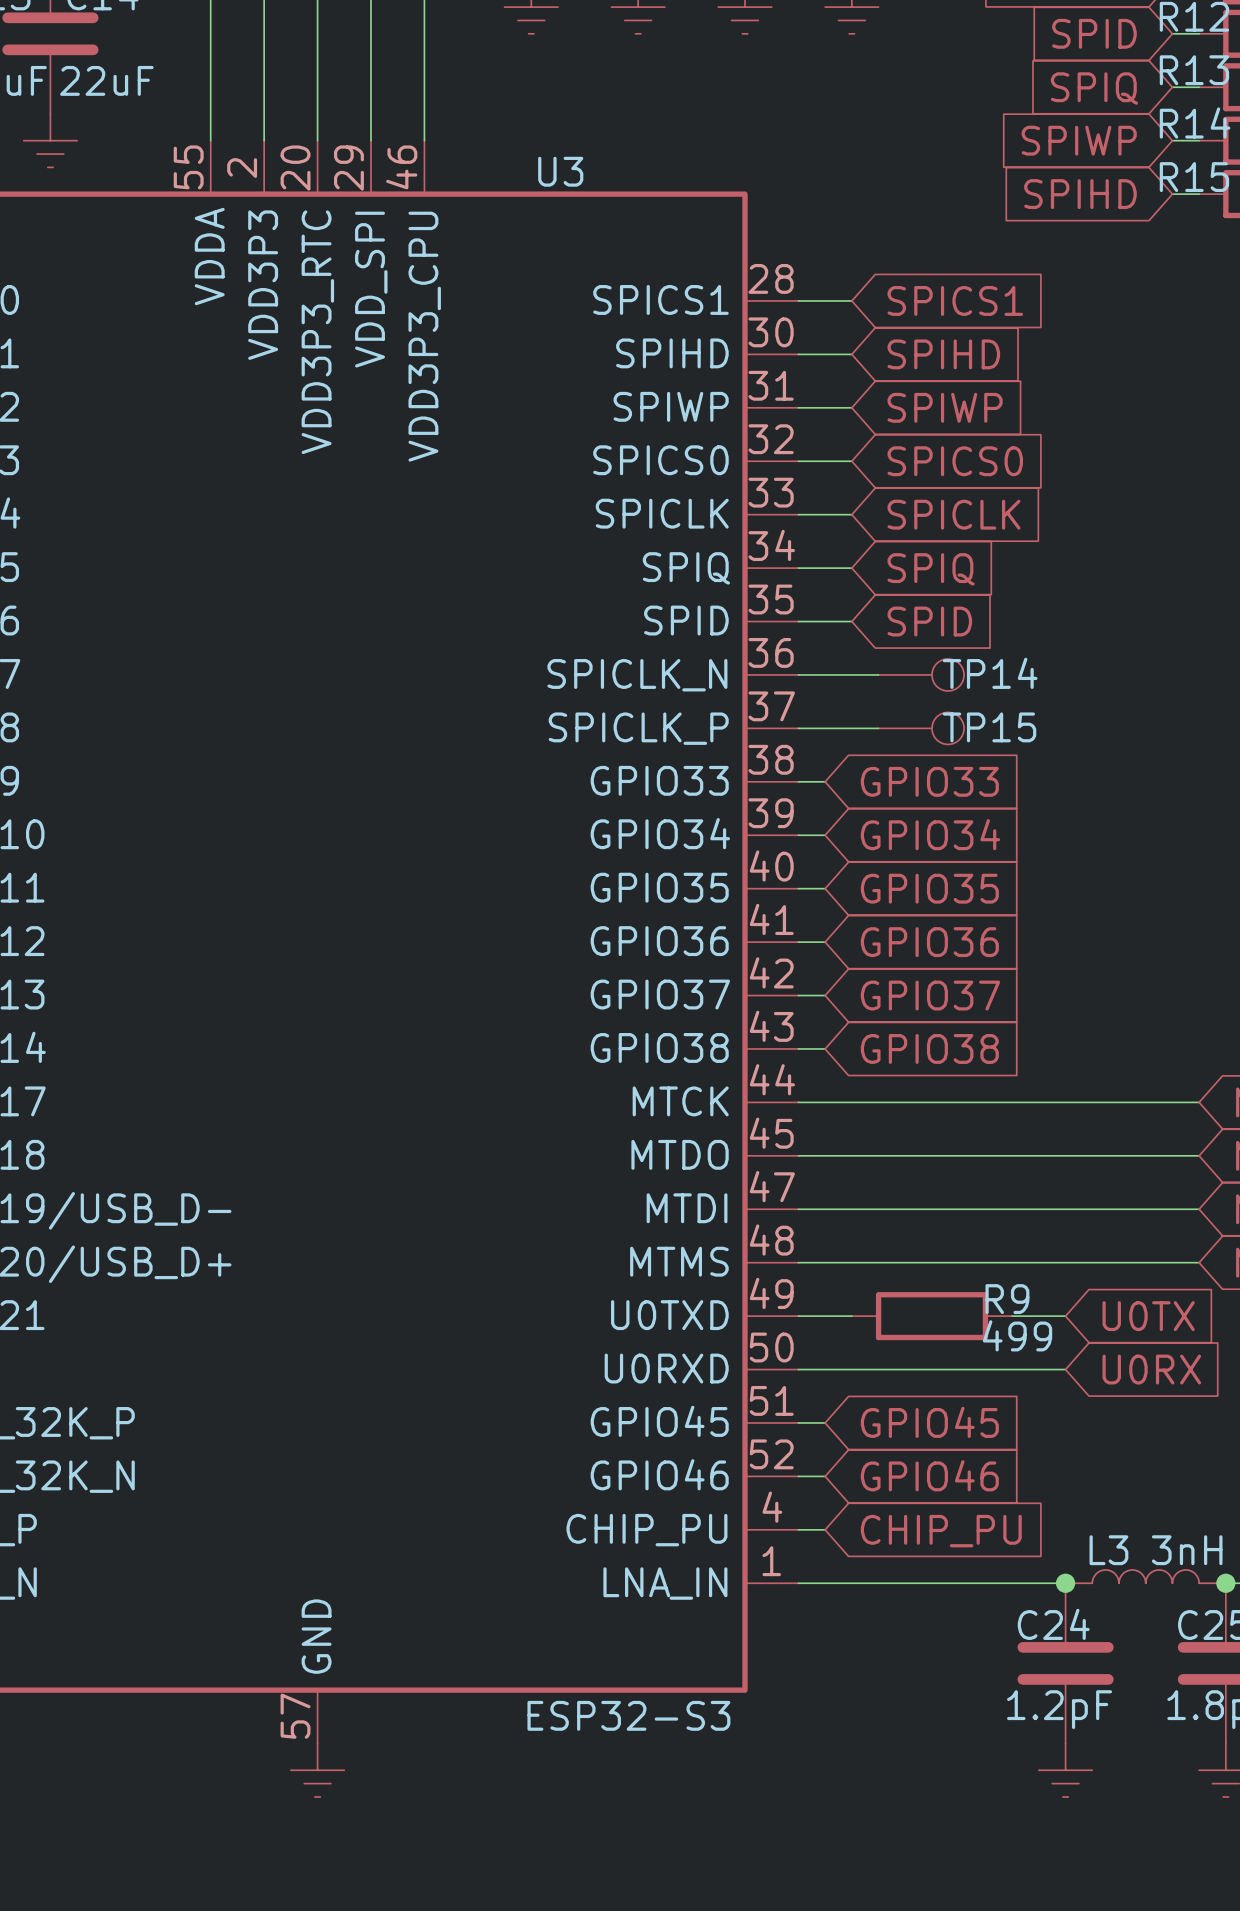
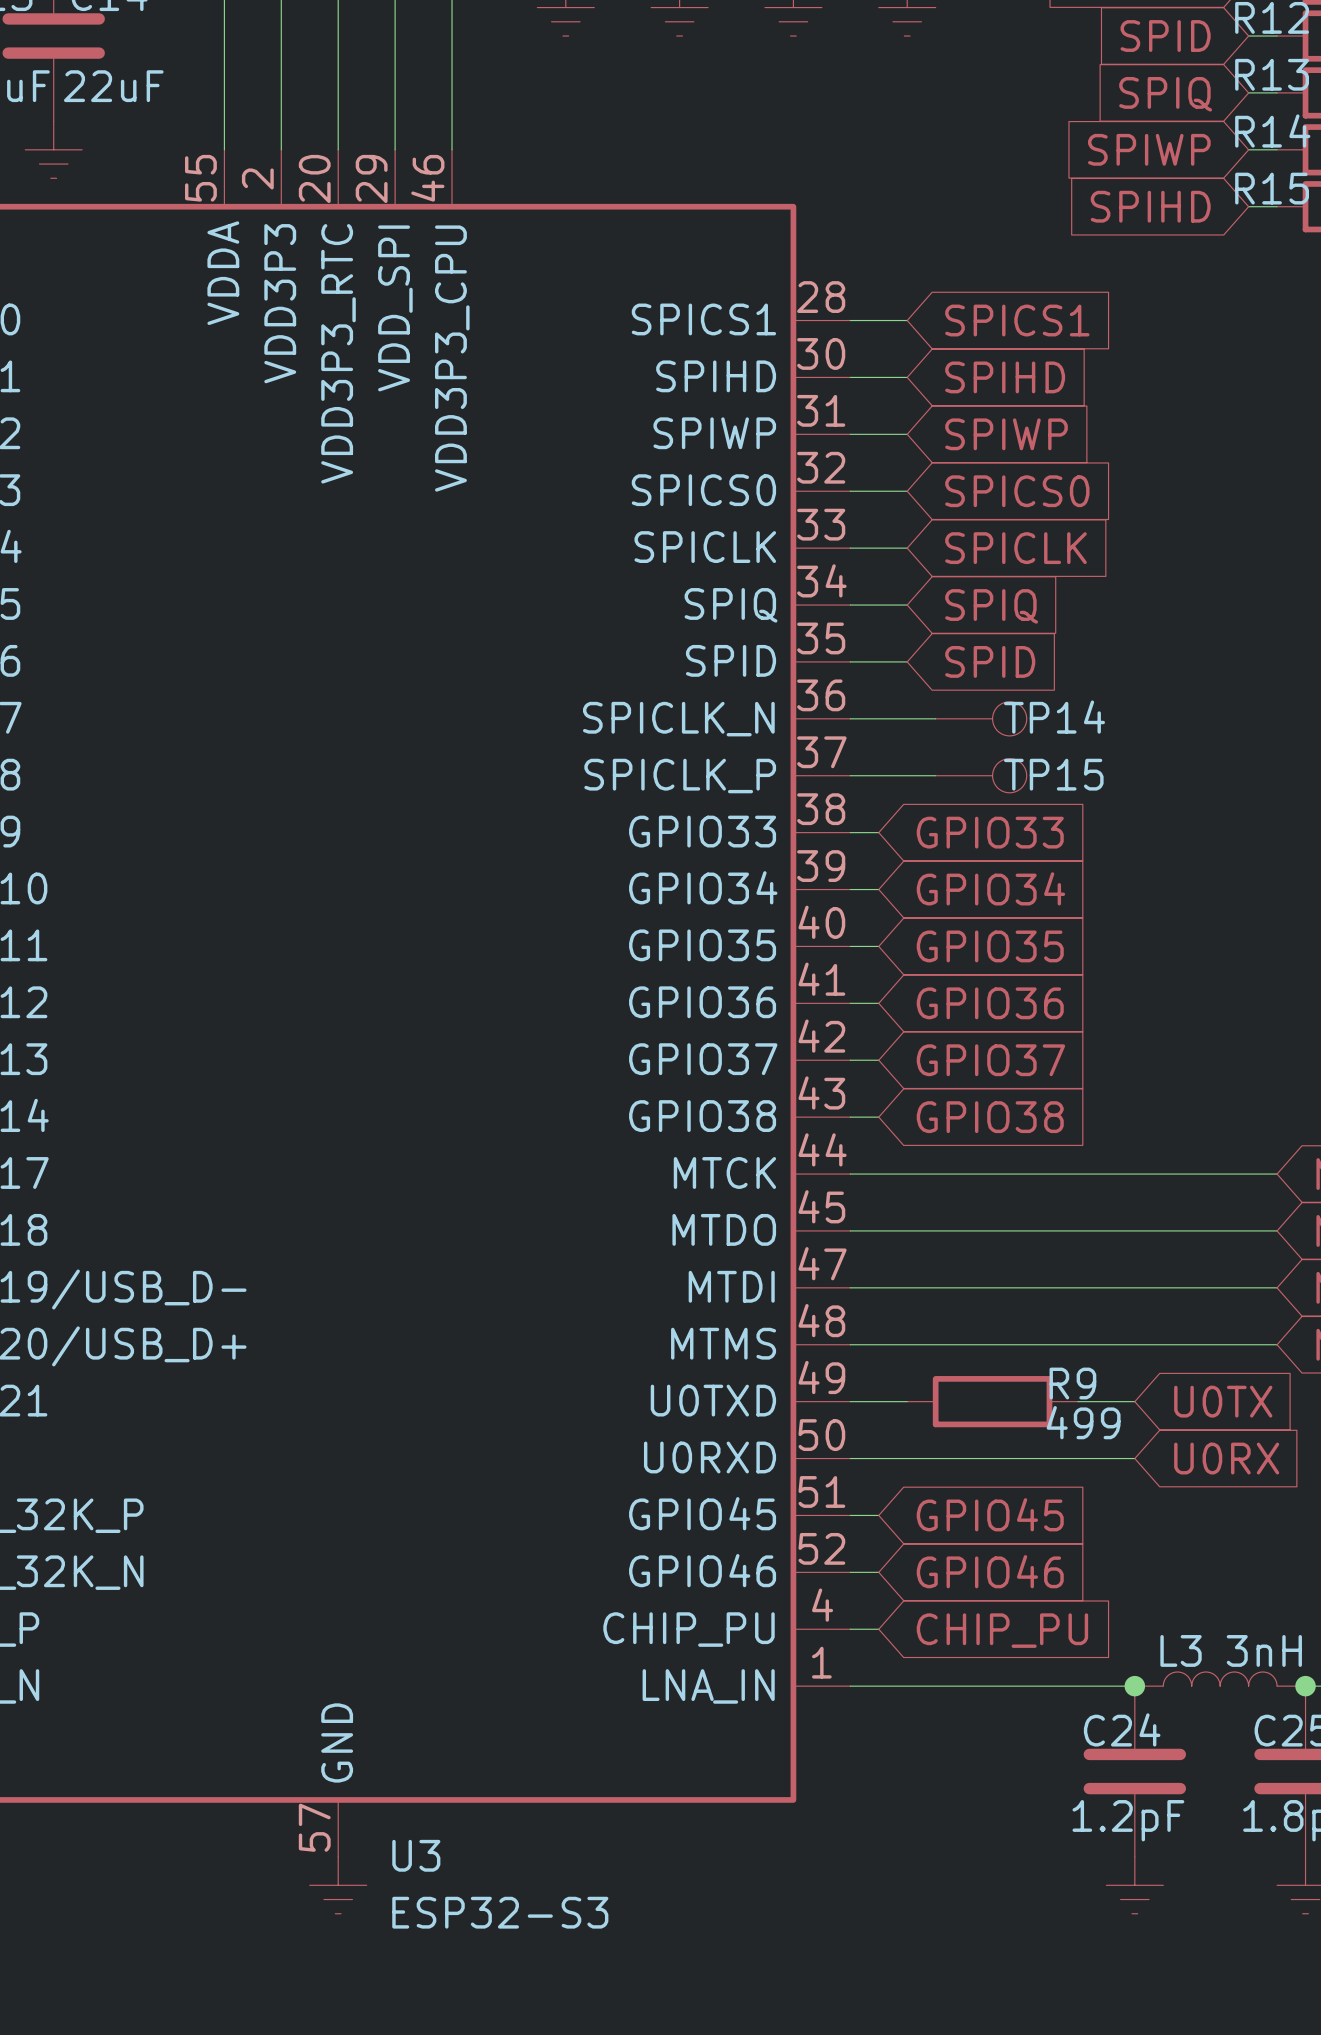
U3 name position: U3 (560, 171) -> U3 (416, 1855)
U3 value position: ESP32-S3 (628, 1715) -> ESP32-S3 (500, 1912)

